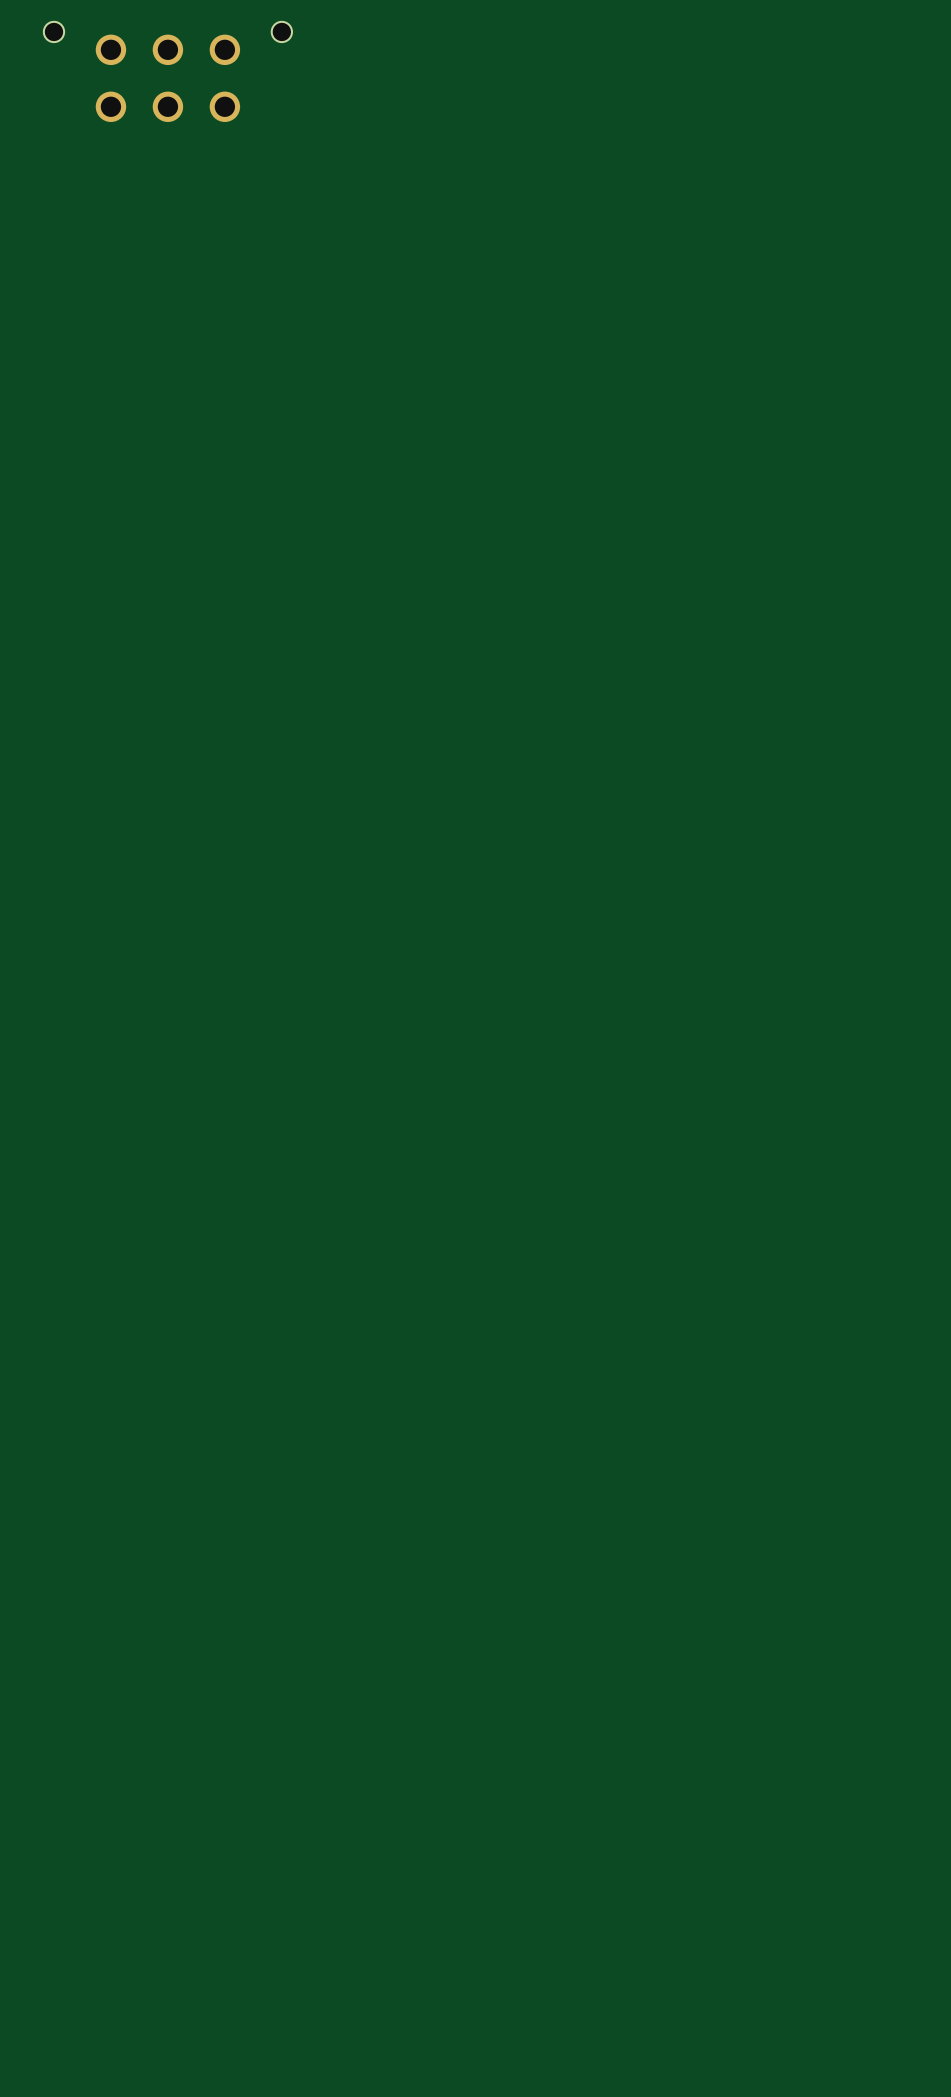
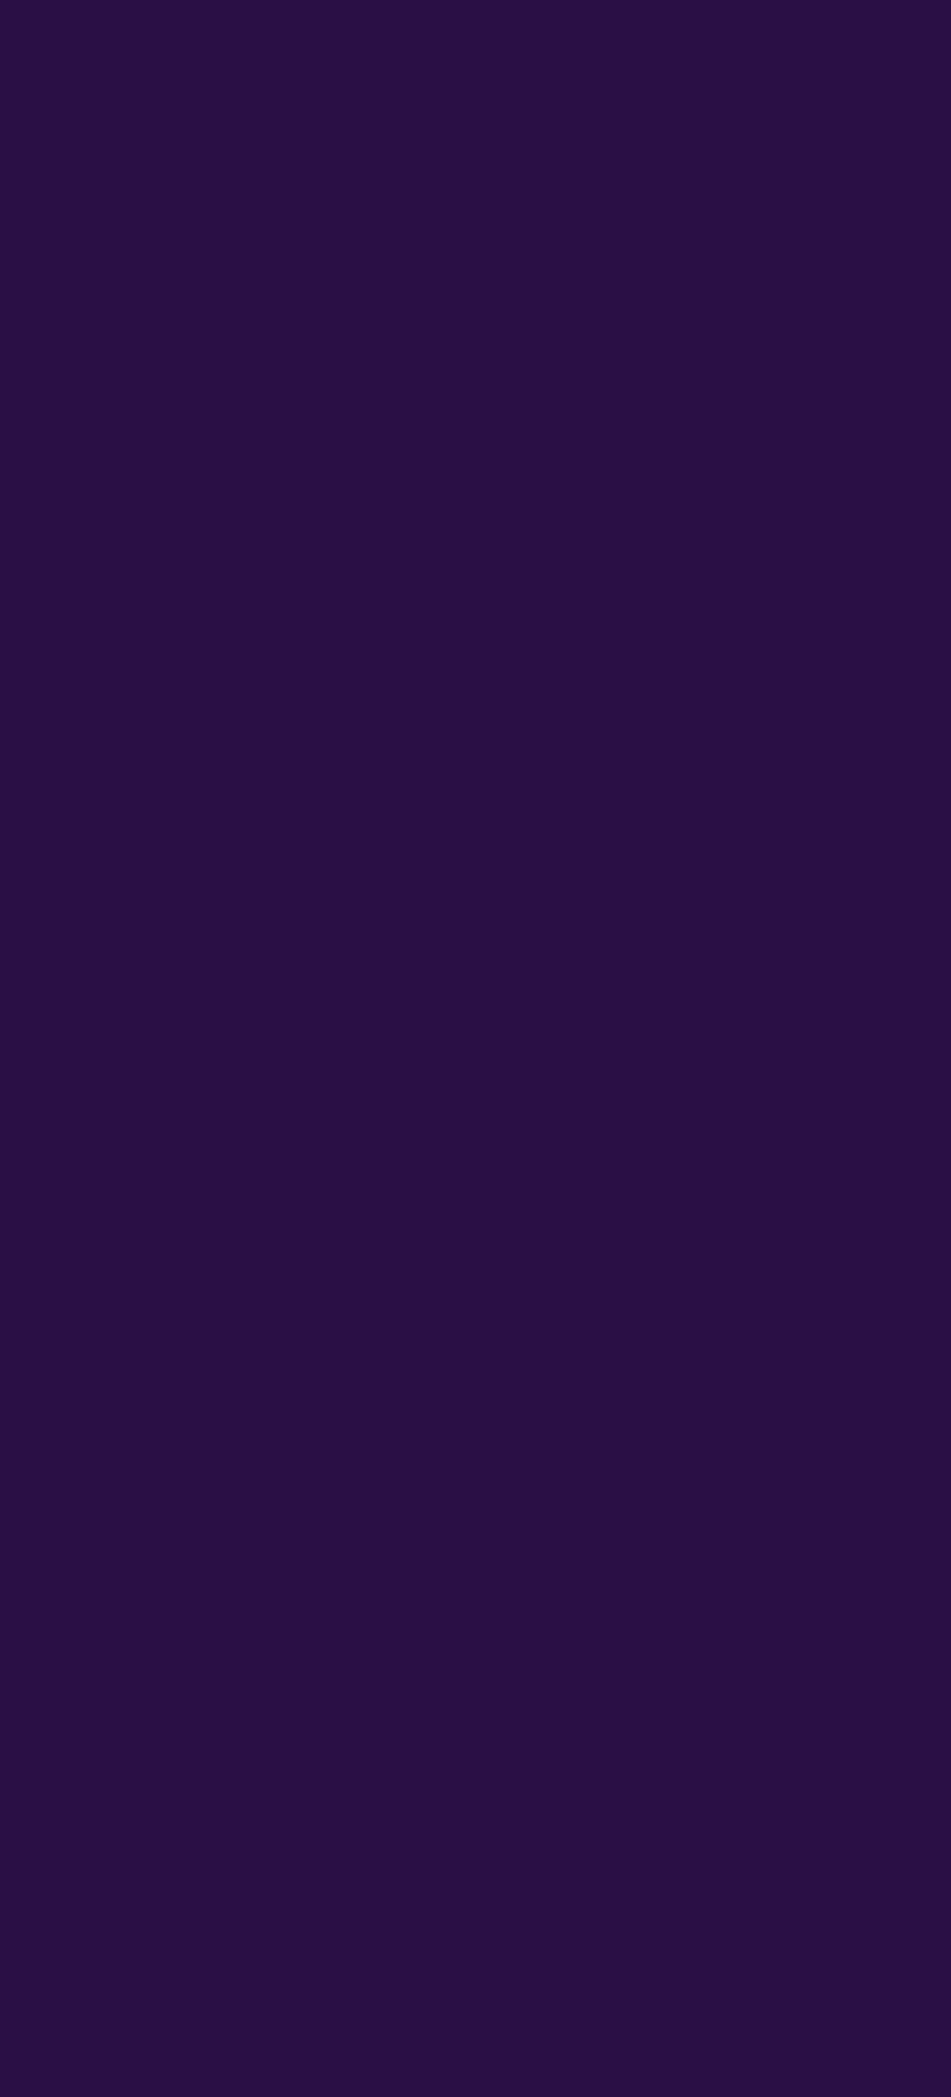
part: (167, 71) -> none

